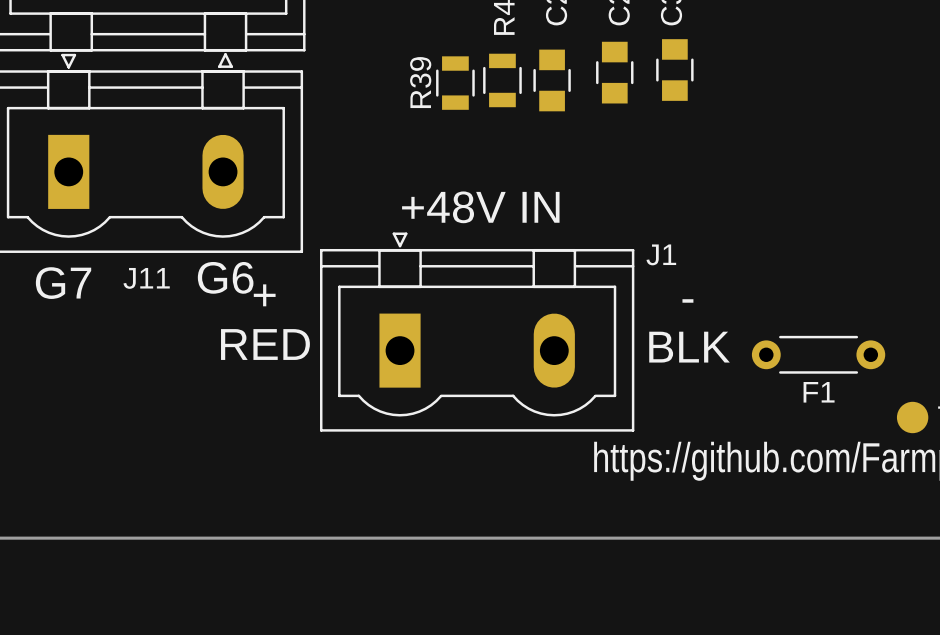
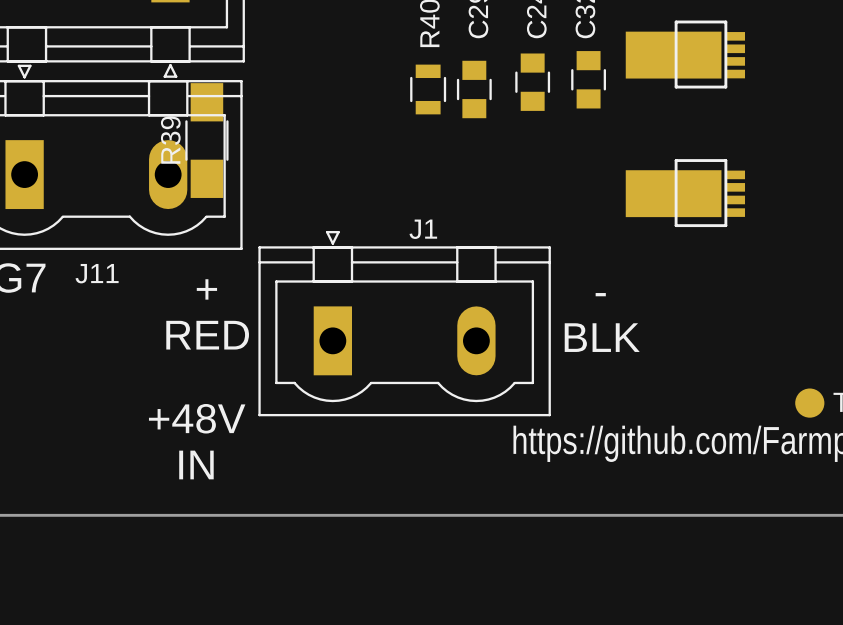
part: none -> (685, 54)
R39 footprint: [436, 56, 475, 110] -> [185, 83, 229, 198]
part: none -> (685, 193)
text: +48V IN (480, 207) -> none
J1 name position: J1 (661, 254) -> J1 (423, 229)
text: G6 (225, 277) -> none
F1: (818, 354) -> none
text: none -> +48V (197, 418)
text: none -> IN (196, 464)

